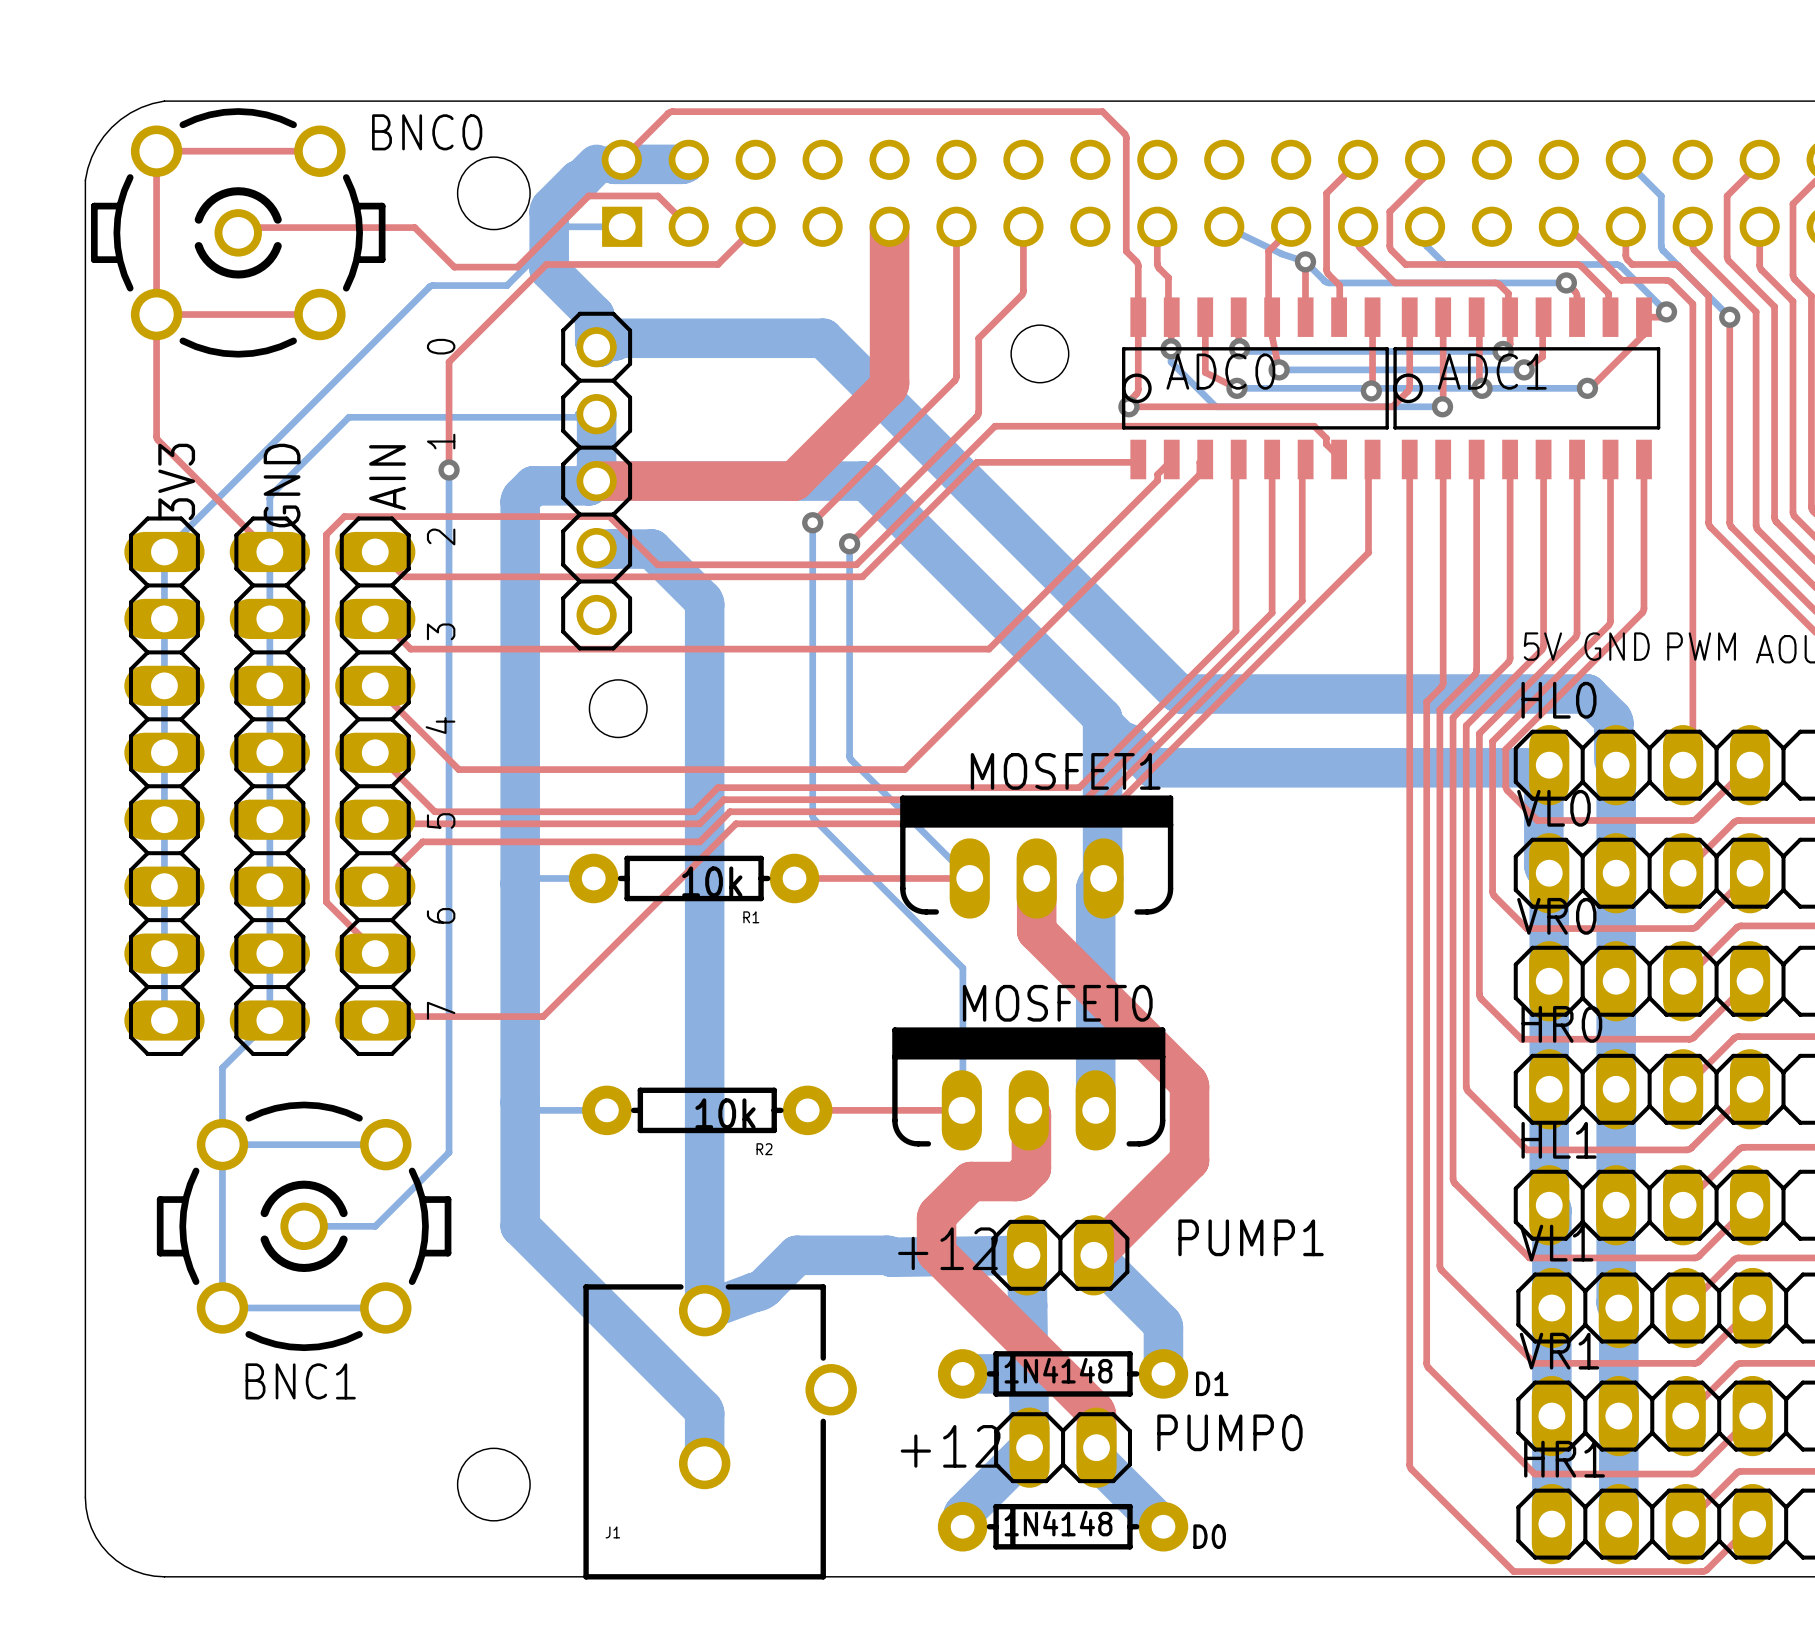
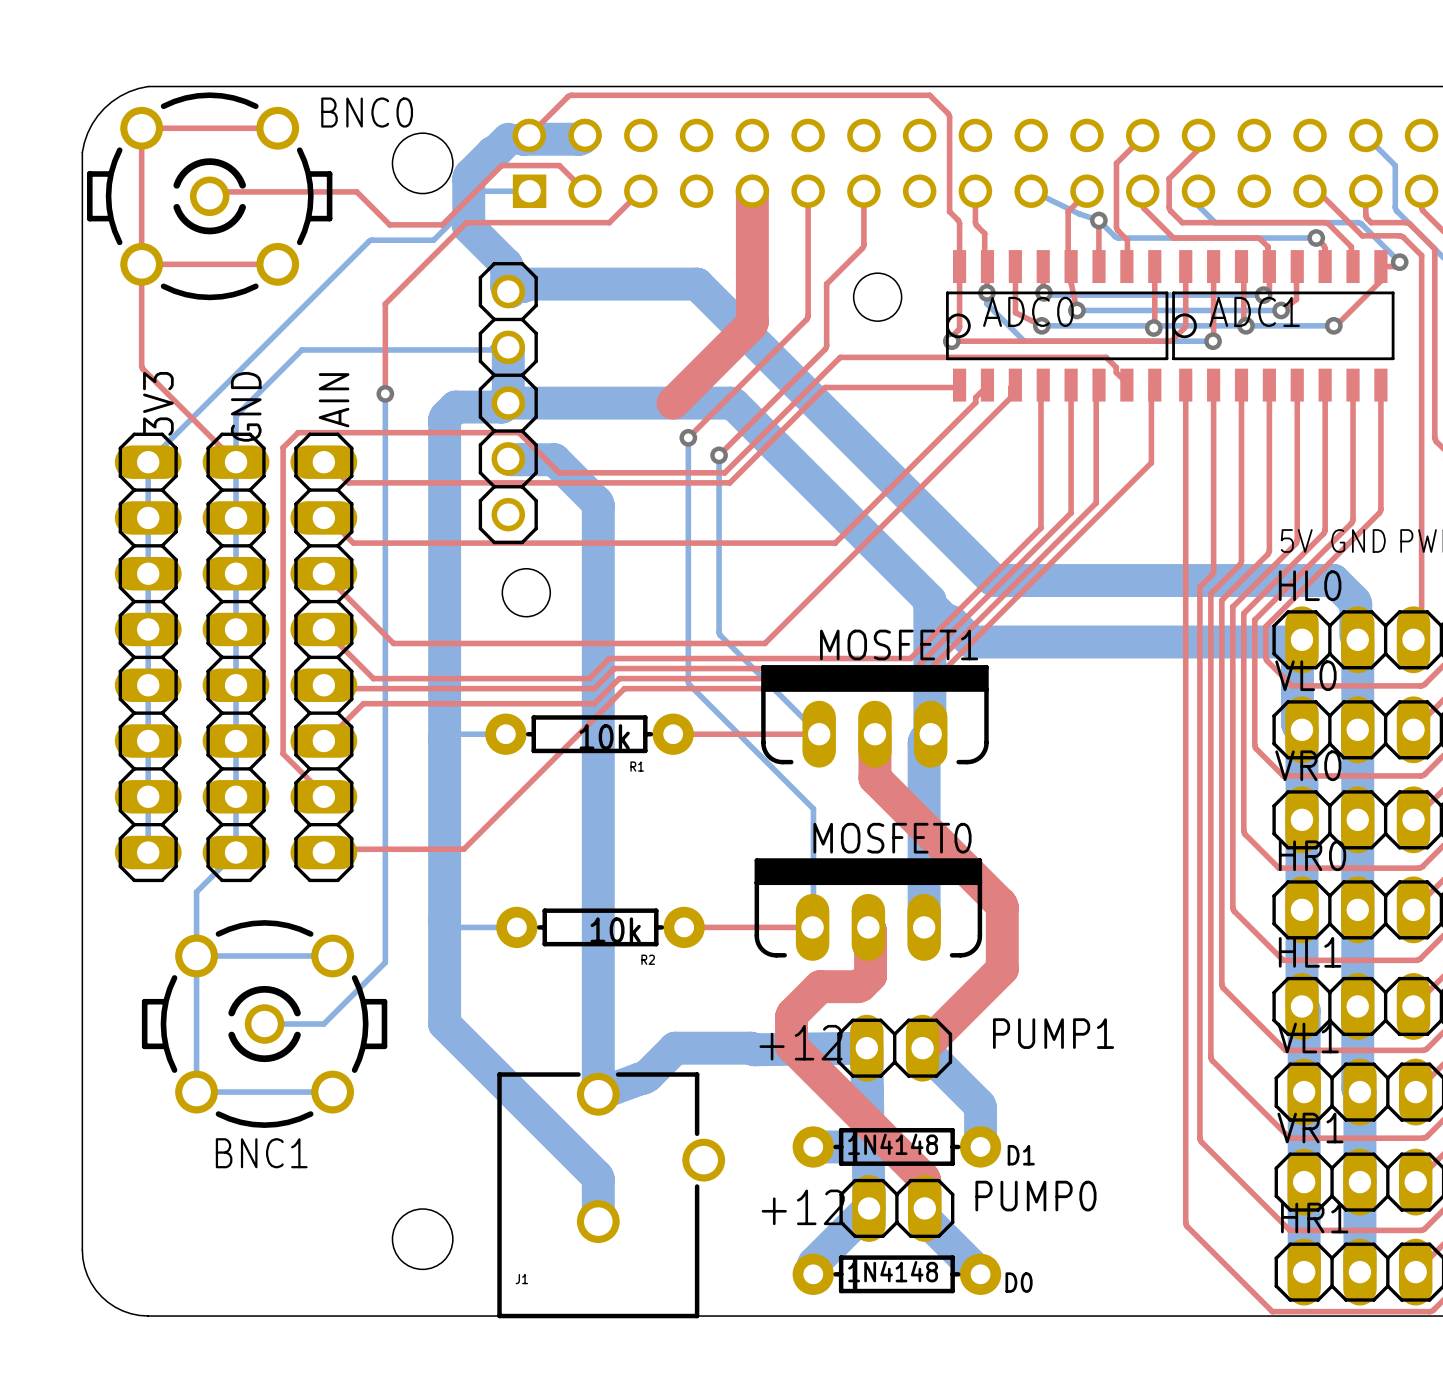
top track: (596, 481) (794, 481) -> none
text: 7 6 5 4 3 2 1 0 (440, 679) -> none

